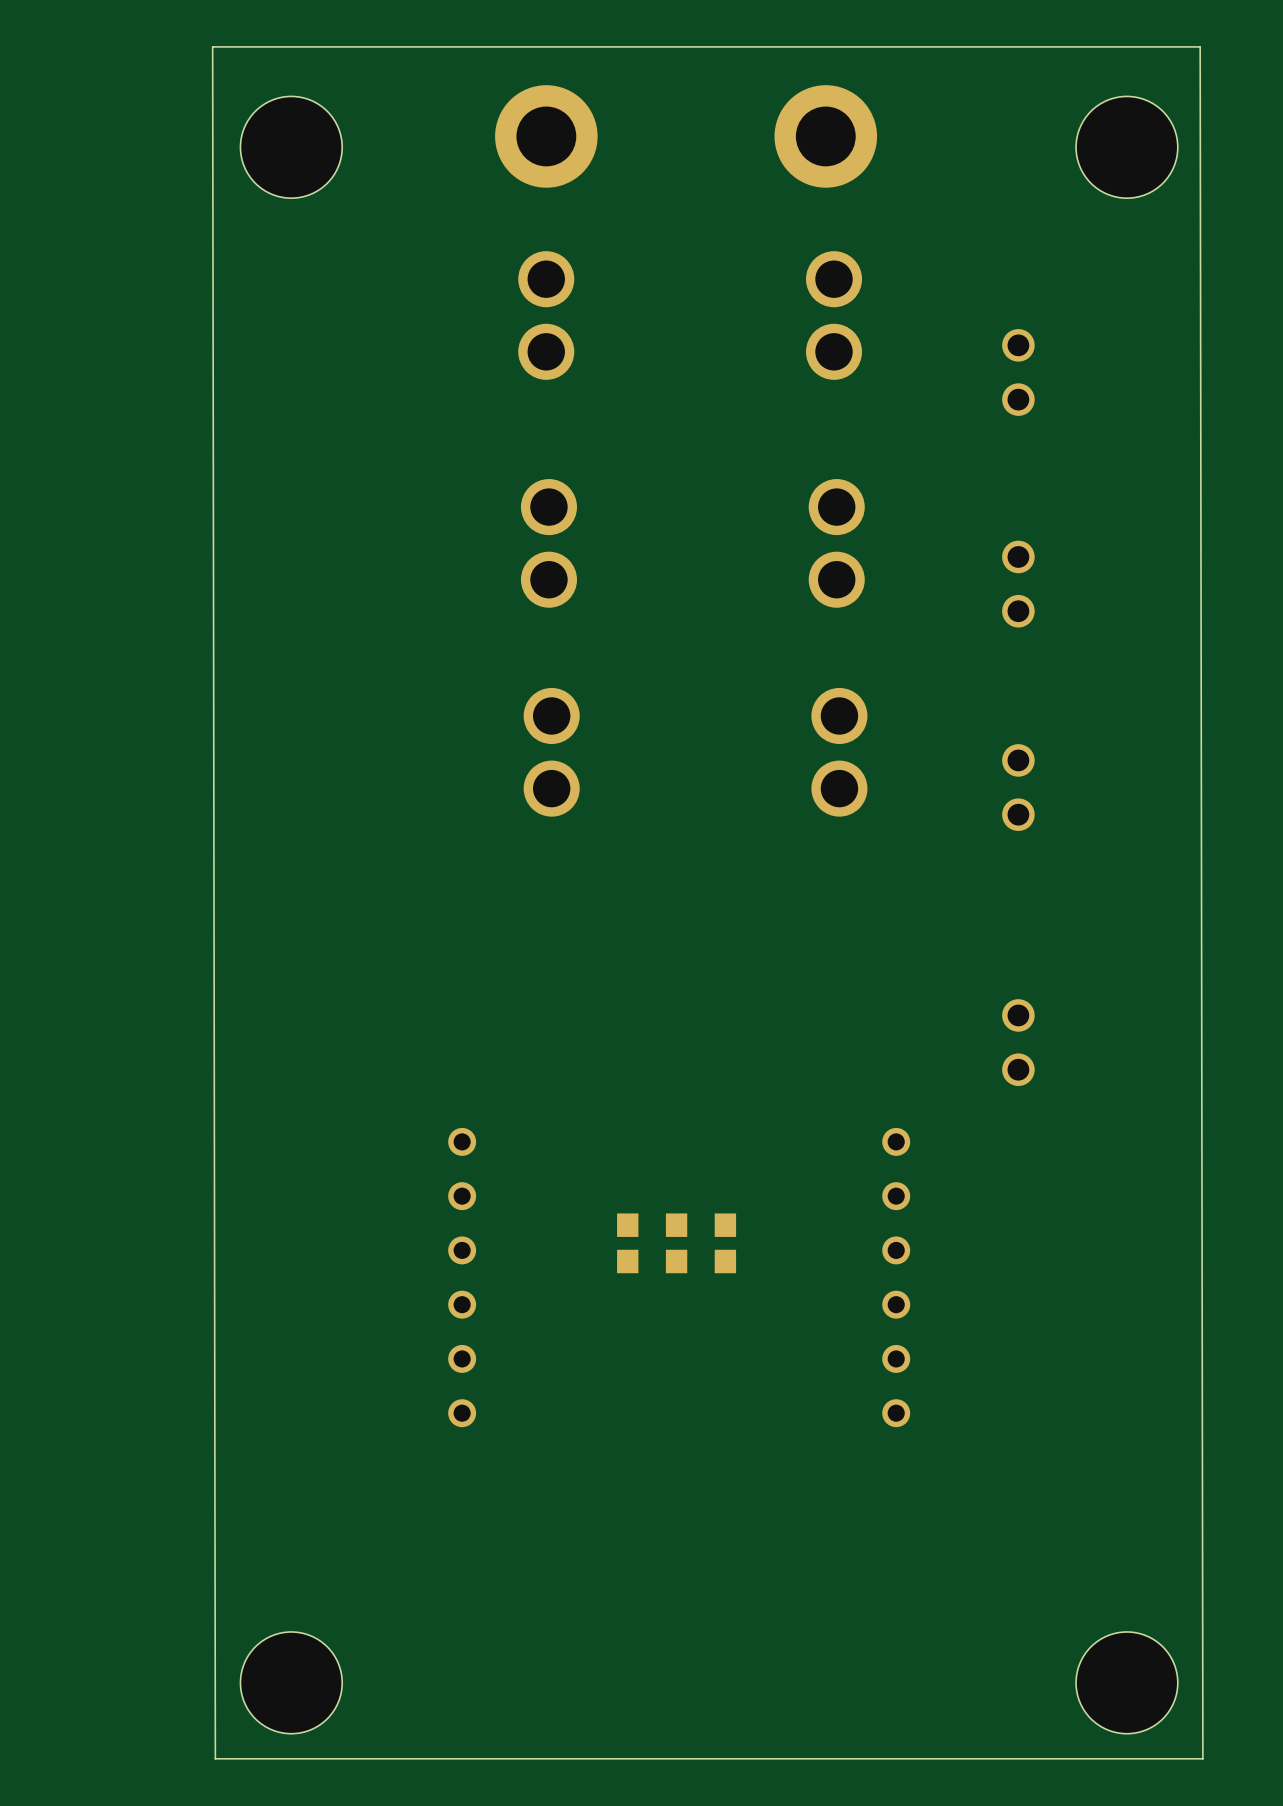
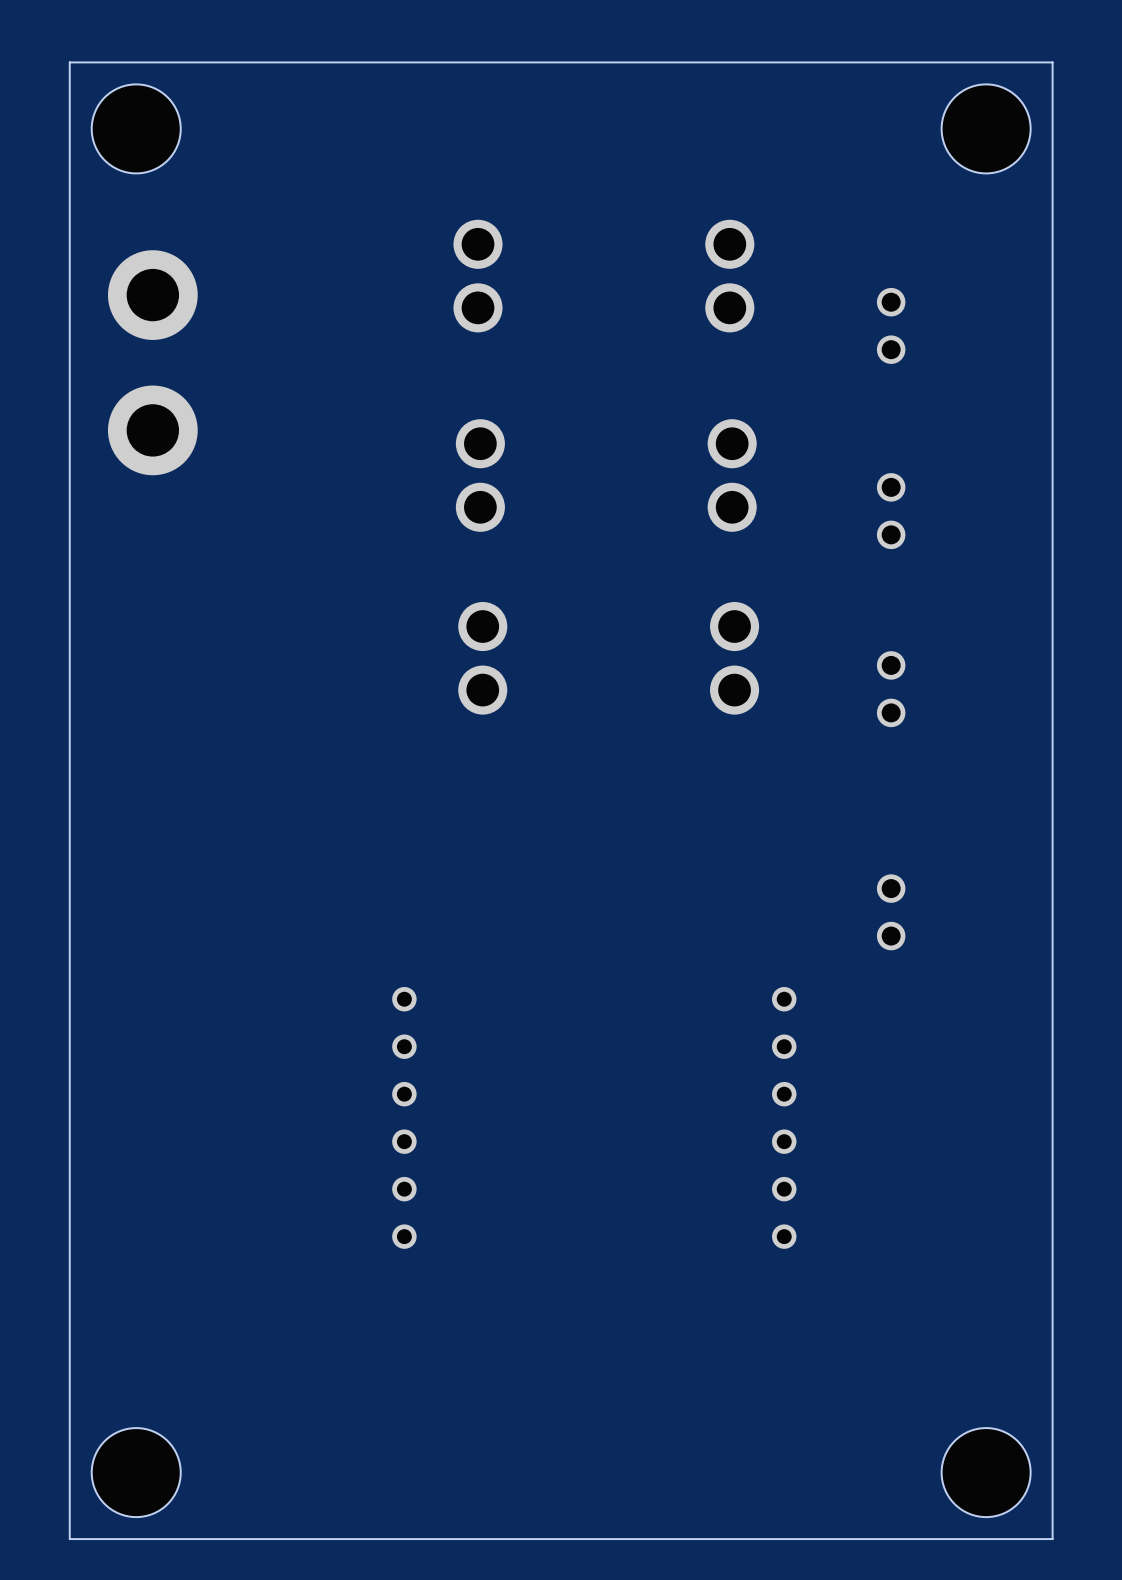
part: (546, 136) -> none
part: (825, 136) -> none
hole position: (291, 147) -> (136, 128)
part: none -> (152, 295)
part: none -> (152, 430)
part: (627, 1243) -> none
part: (676, 1243) -> none
part: (725, 1243) -> none
hole position: (291, 1682) -> (136, 1472)
board edge: (1202, 1758) (1200, 46) (212, 46) (215, 1758) -> (1052, 1539) (1052, 62) (69, 62) (69, 1539) (188, 1539)

